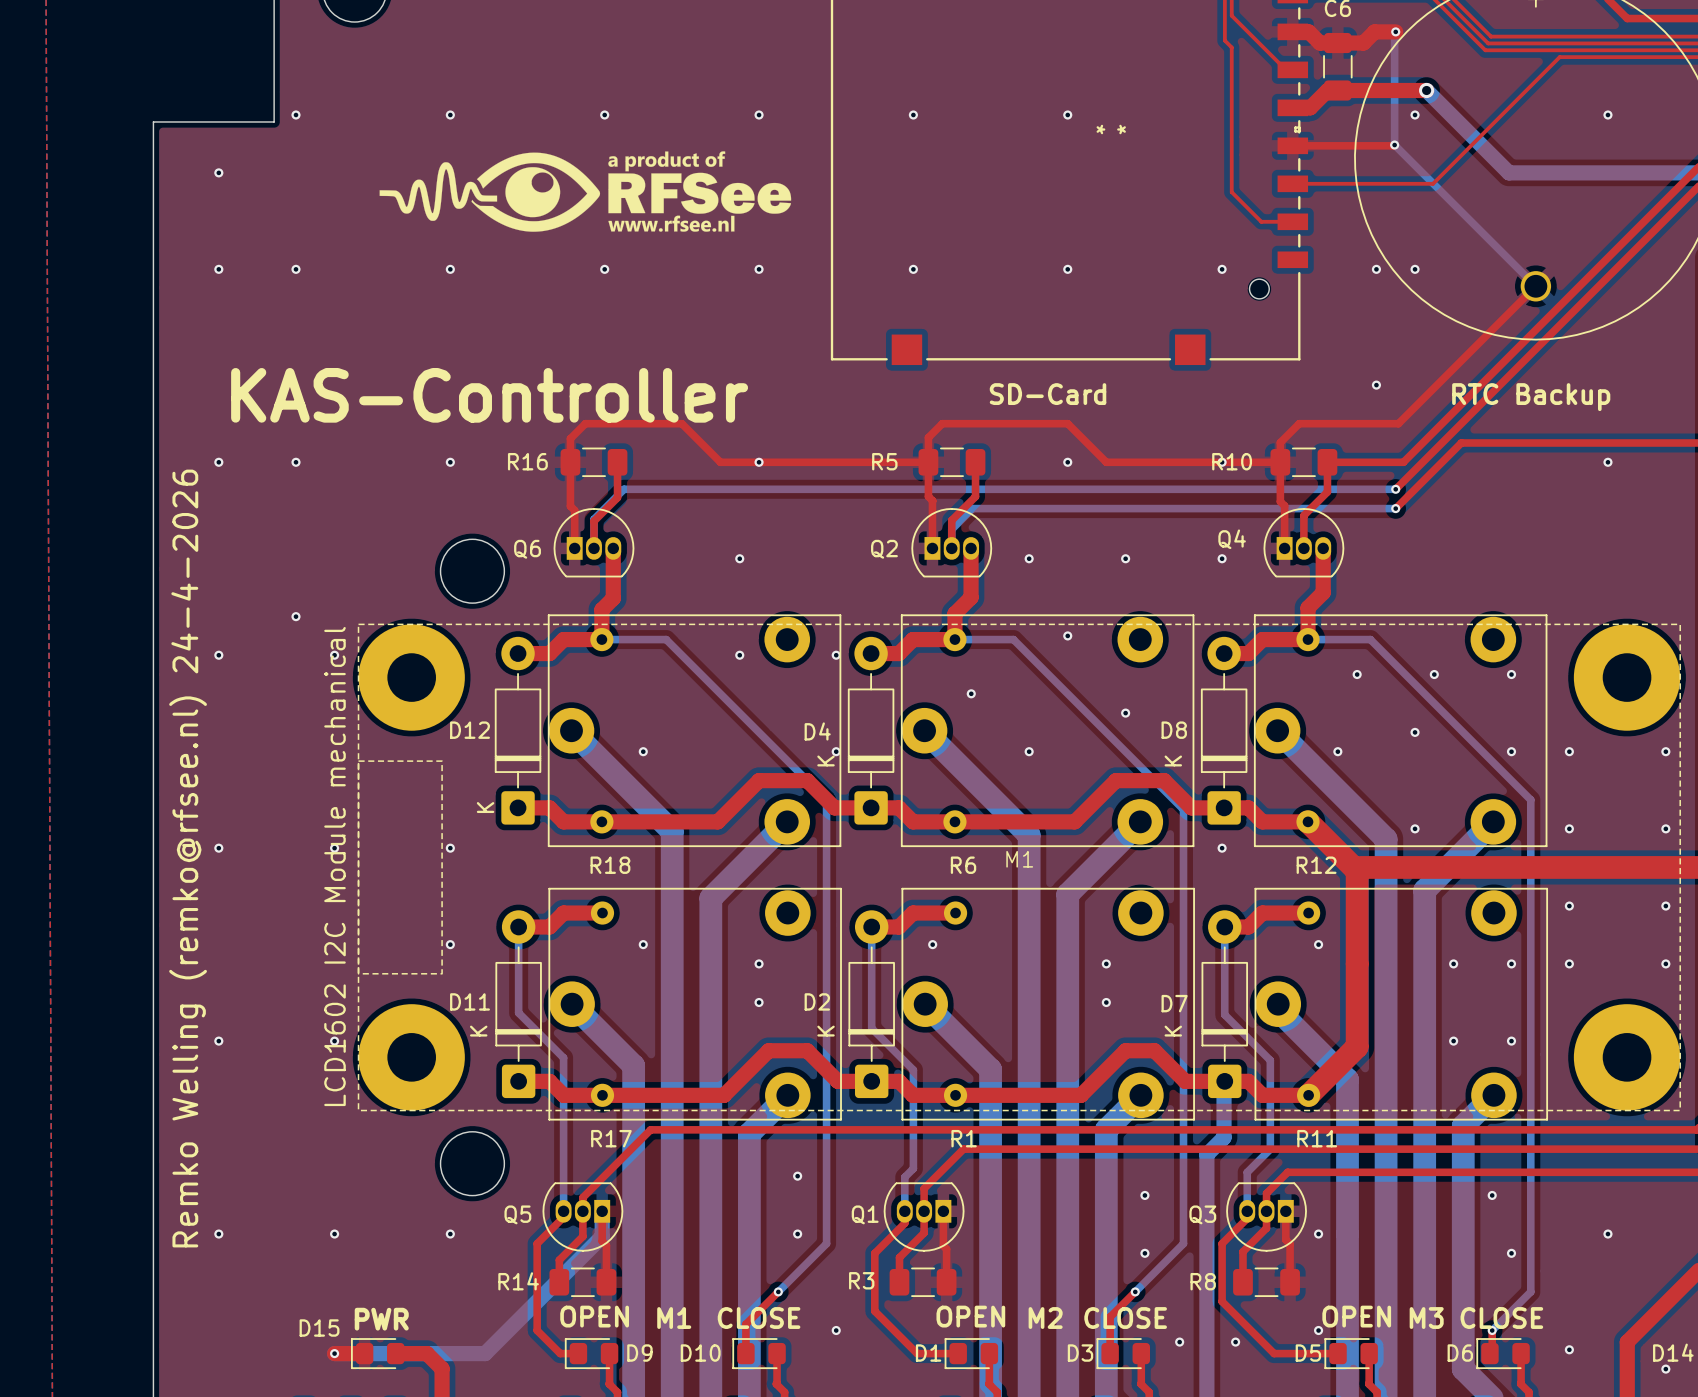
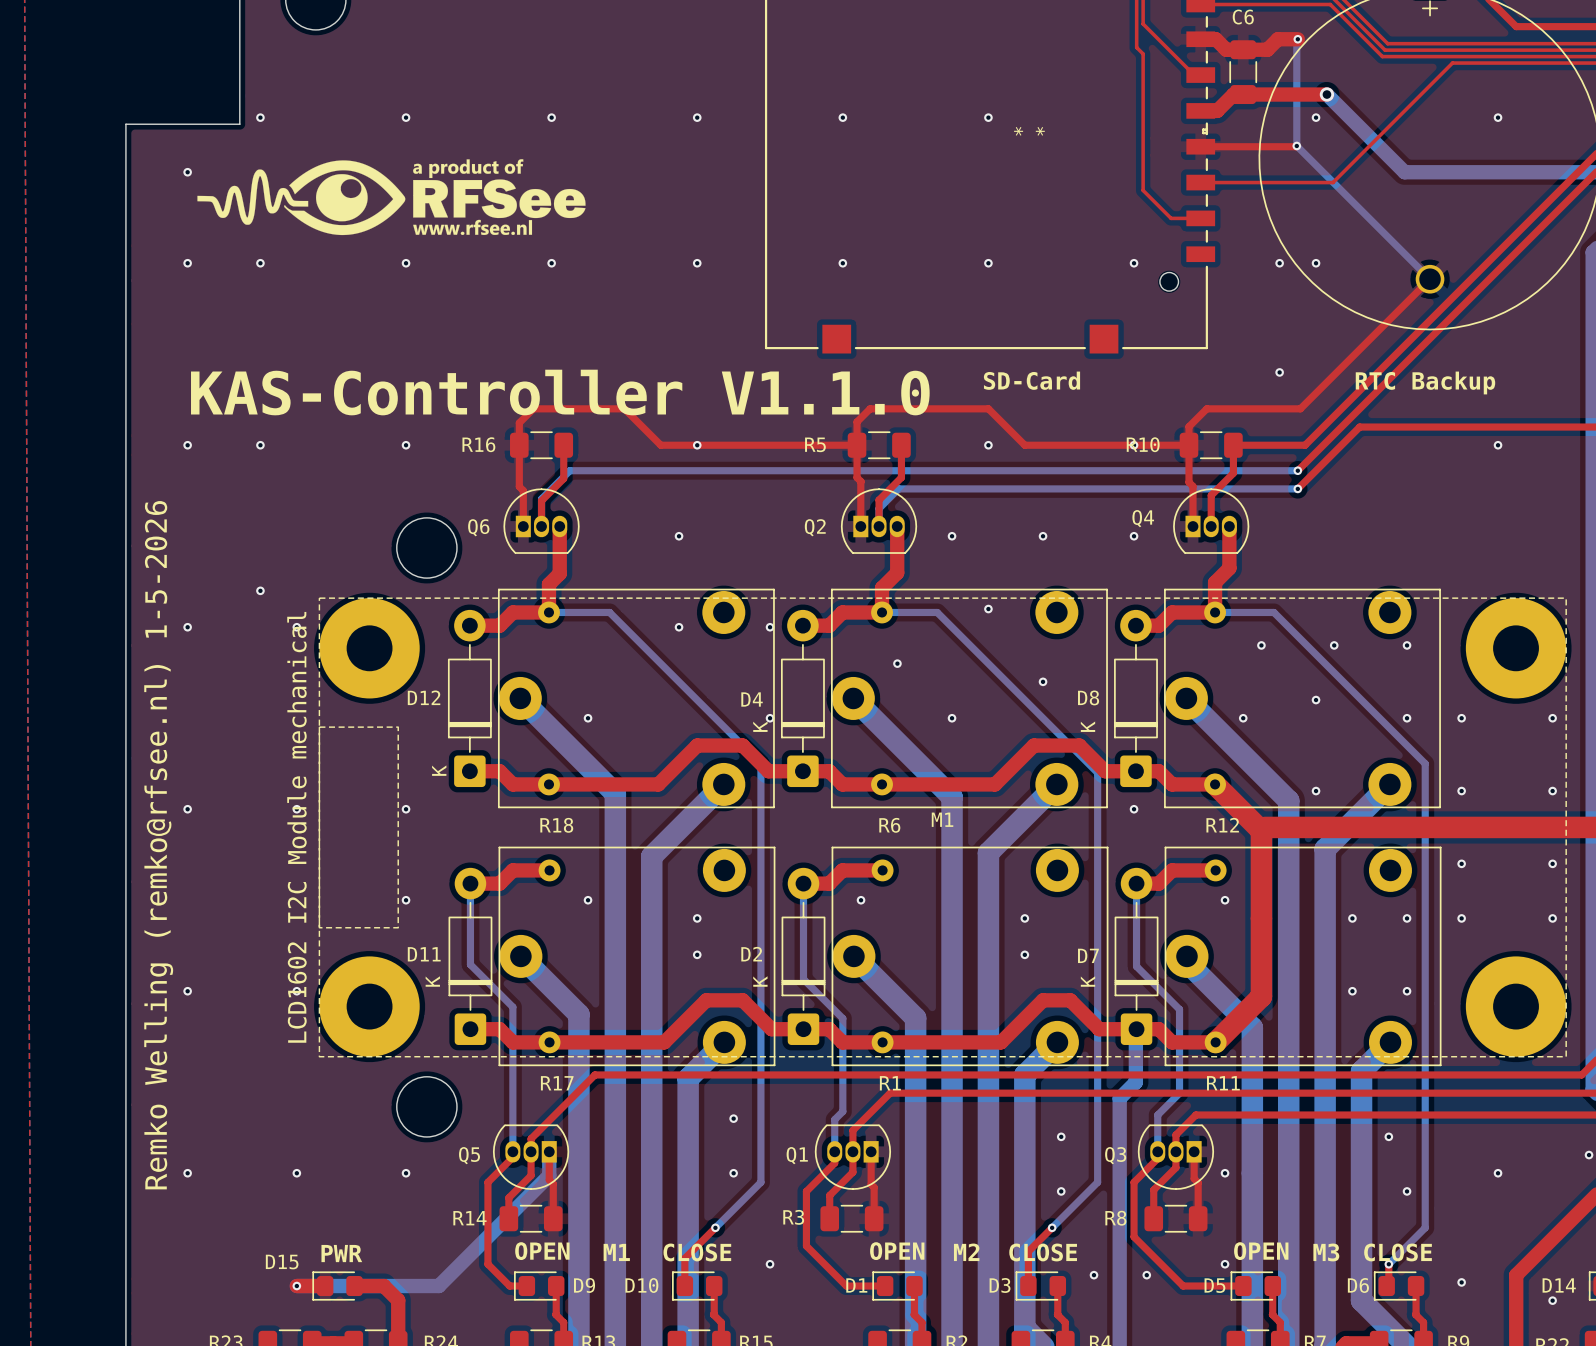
drawing position: (585, 191) -> (391, 197)
text position: SD-Card (1048, 394) -> SD-Card (1031, 380)
text: KAS-Controller (489, 395) -> KAS-Controller V1.1.0 (560, 392)
text: Remko Welling (remko@rfsee.nl) 24-4-2026 (188, 858) -> Remko Welling (remko@rfsee.nl) 1-5-2026 (158, 845)

